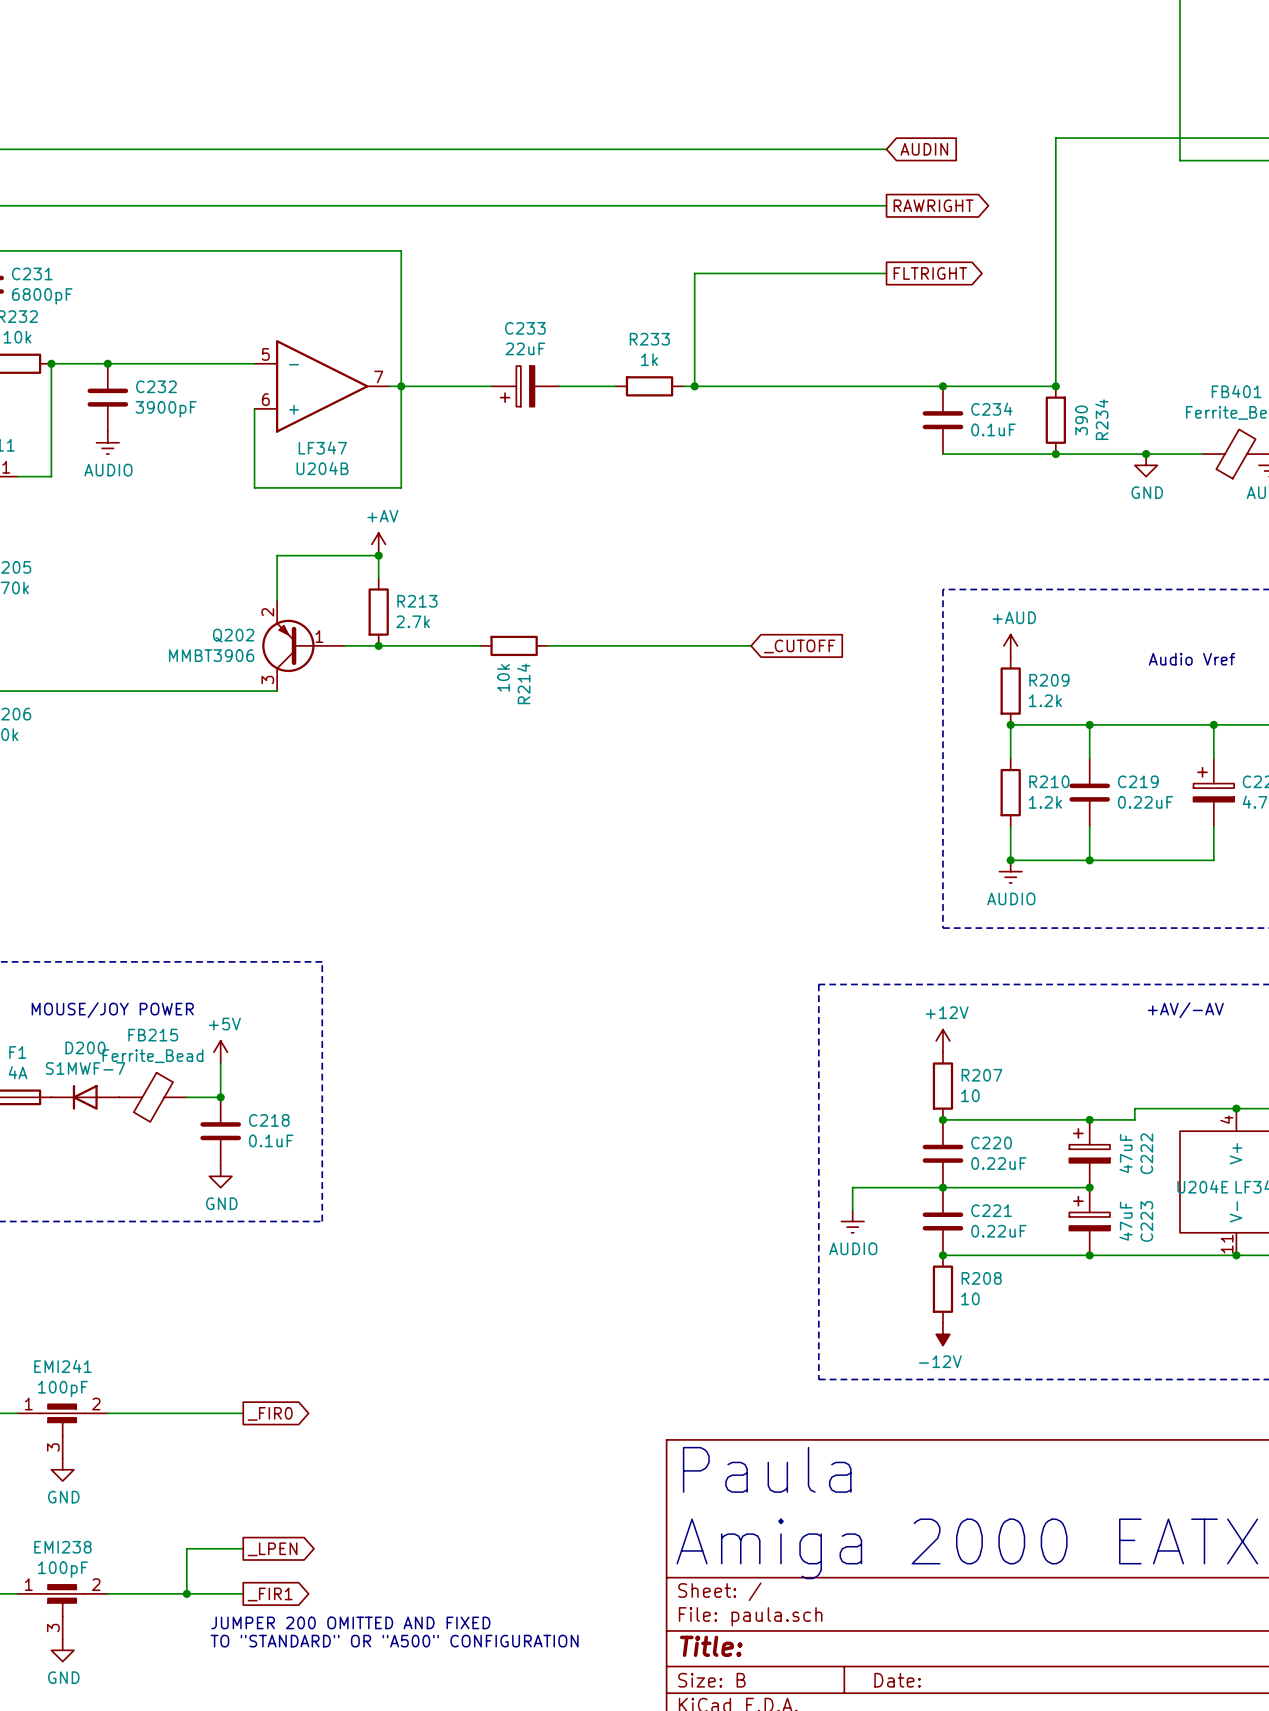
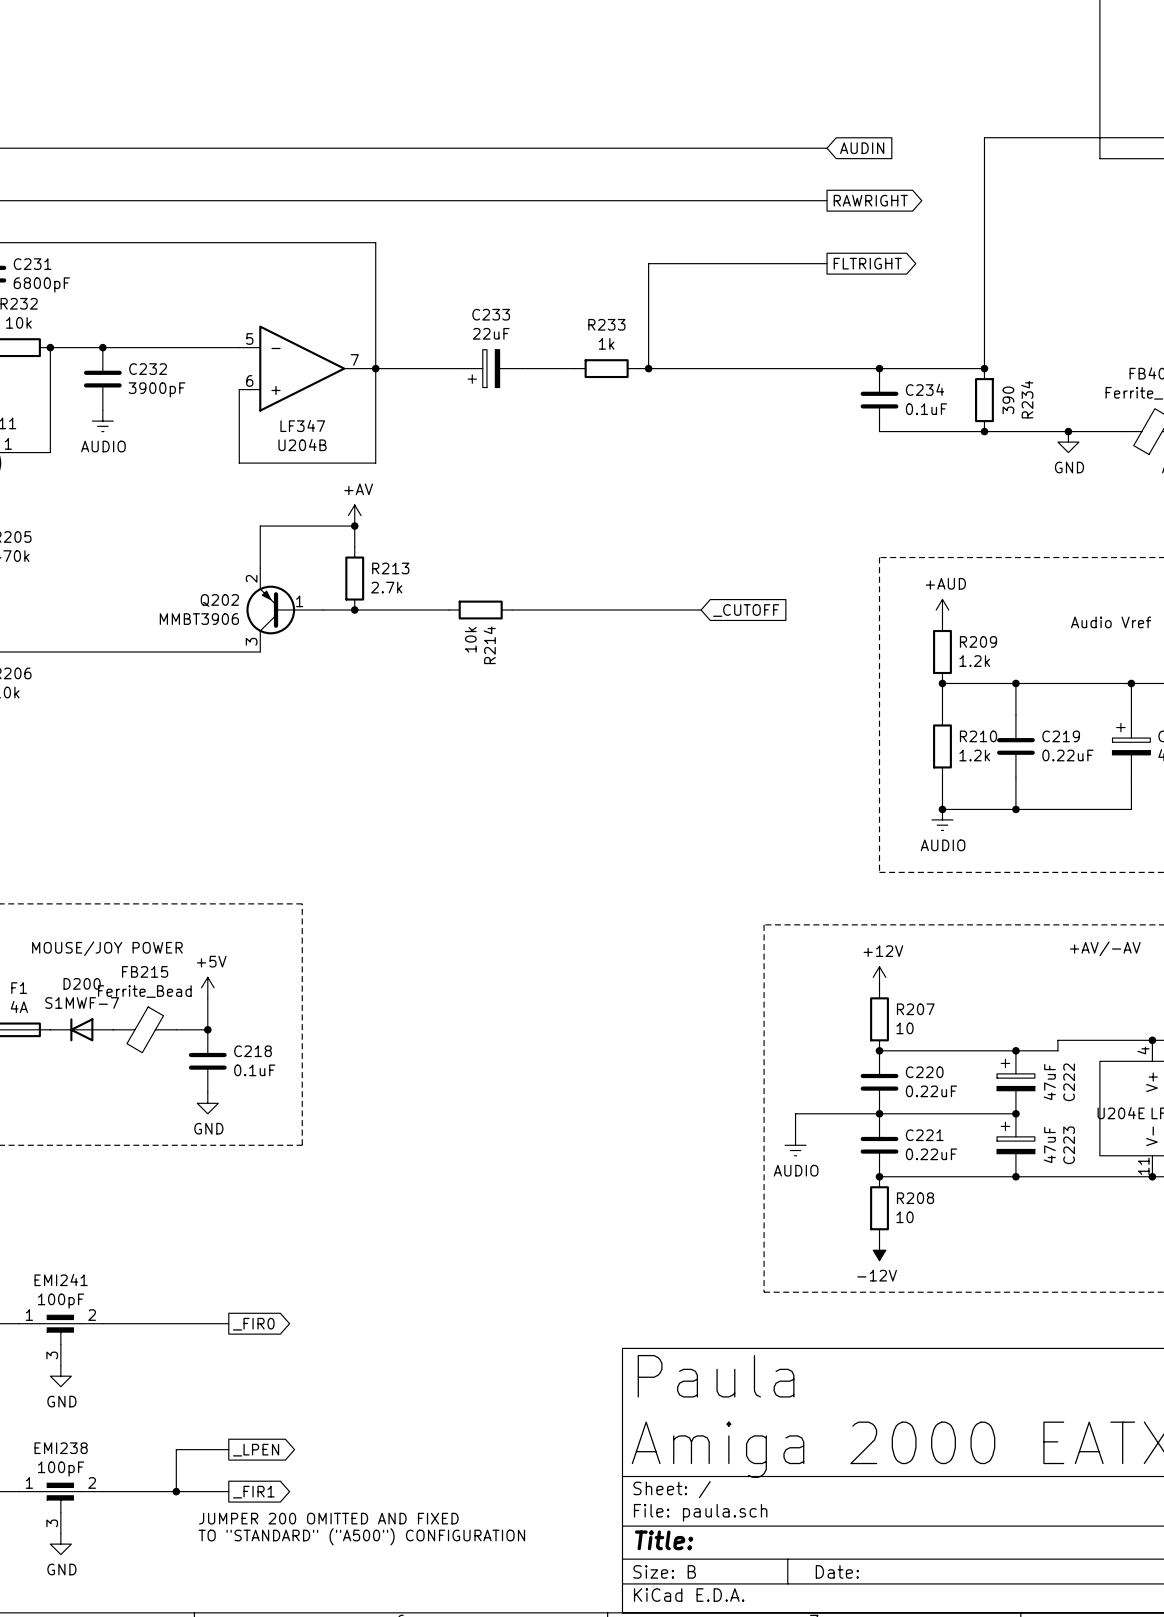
text: TO "STANDARD" OR "A500" CONFIGURATION (394, 1641) -> TO "STANDARD" ("A500") CONFIGURATION (361, 1536)

